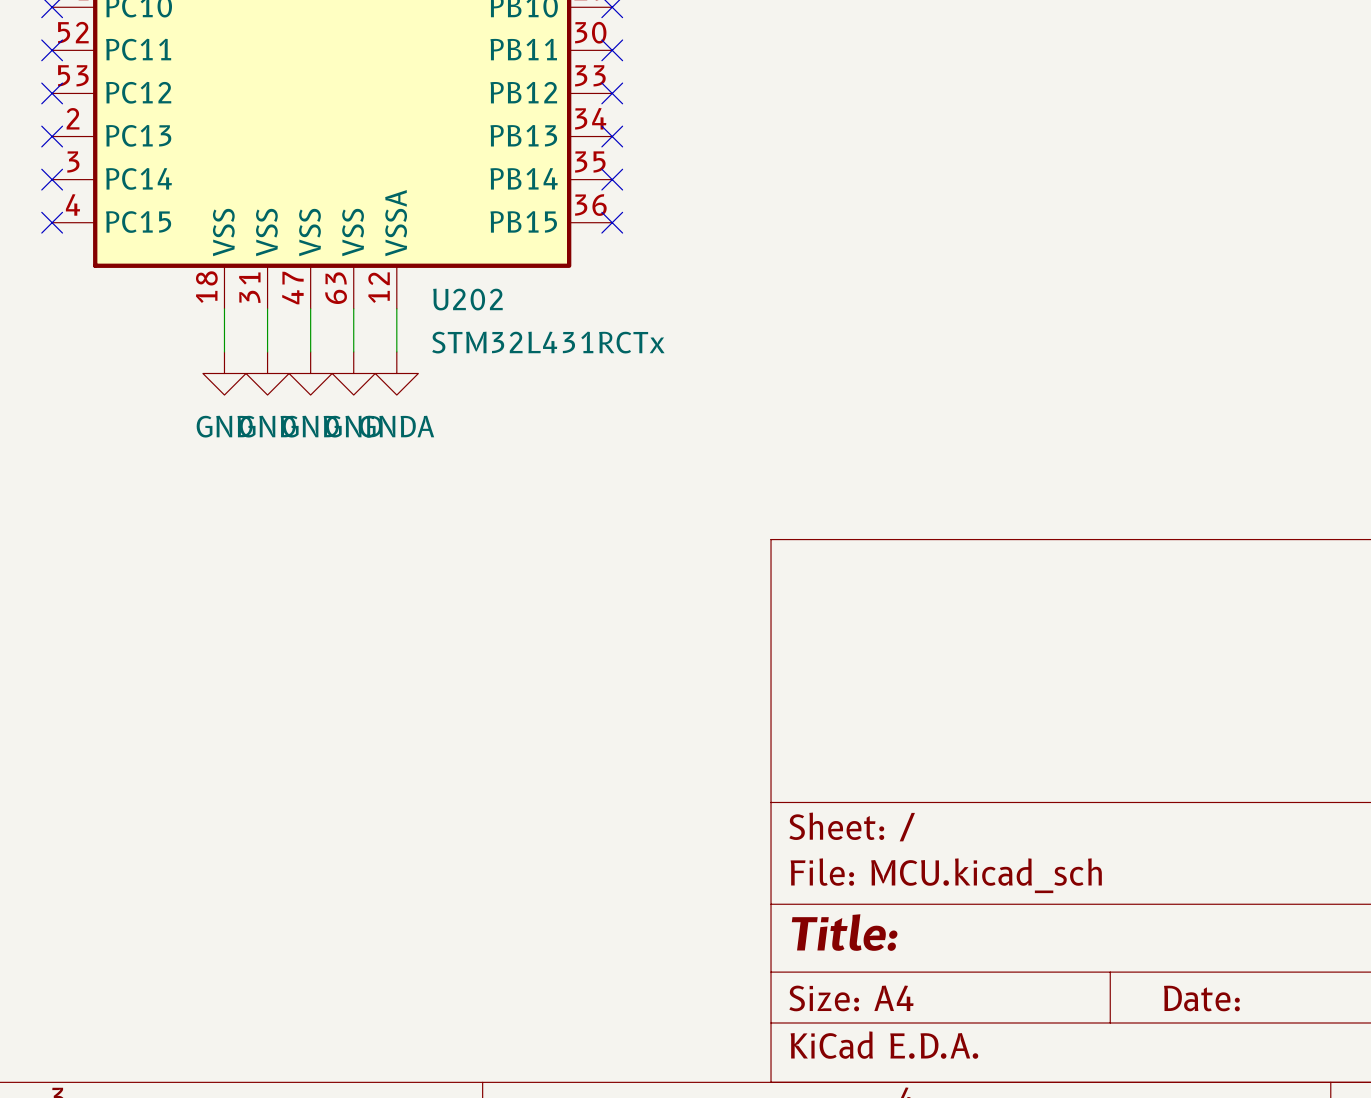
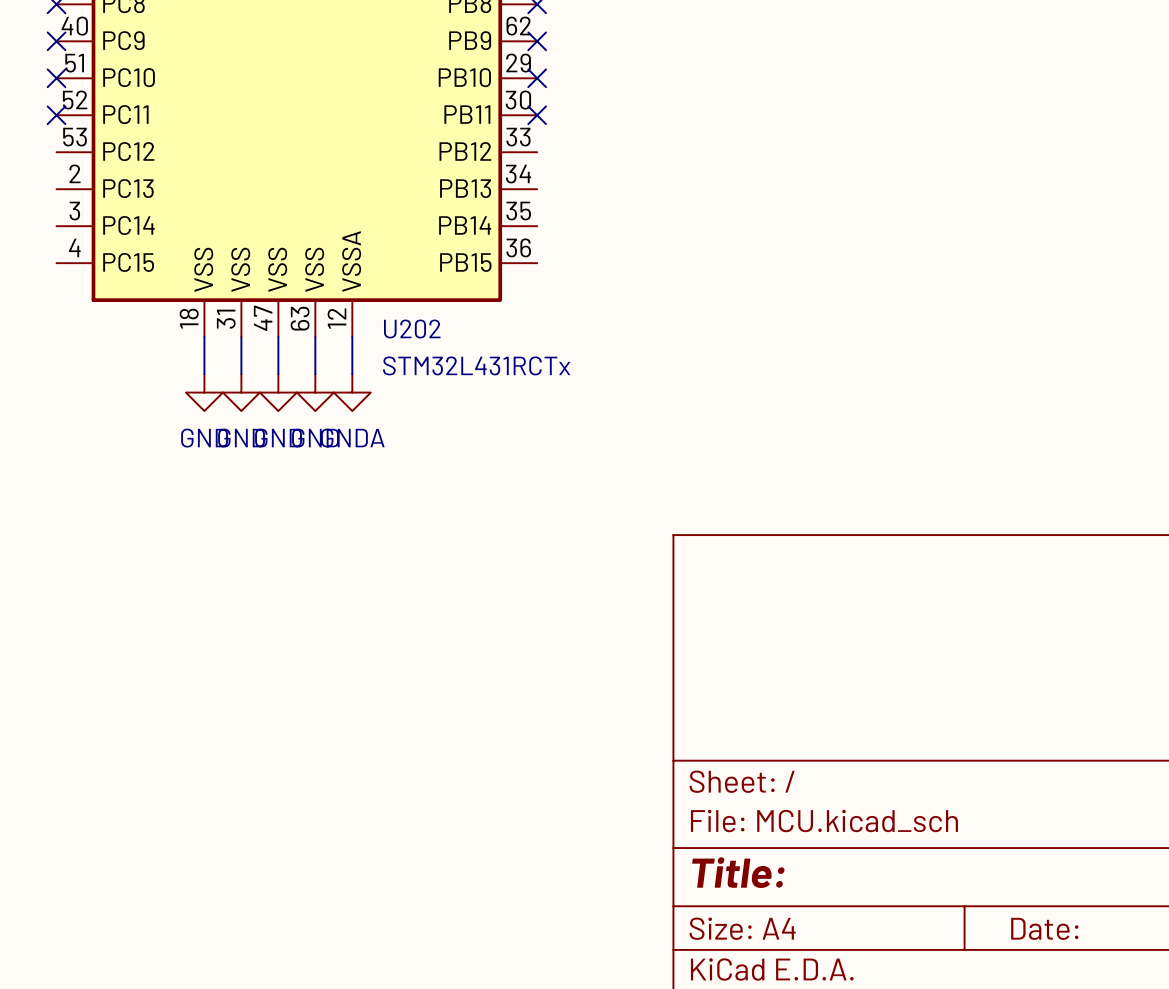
no-connect mark: (52, 93) -> none
no-connect mark: (612, 93) -> none
no-connect mark: (52, 136) -> none
no-connect mark: (612, 136) -> none
no-connect mark: (52, 179) -> none
no-connect mark: (612, 179) -> none
no-connect mark: (52, 222) -> none
no-connect mark: (612, 222) -> none

